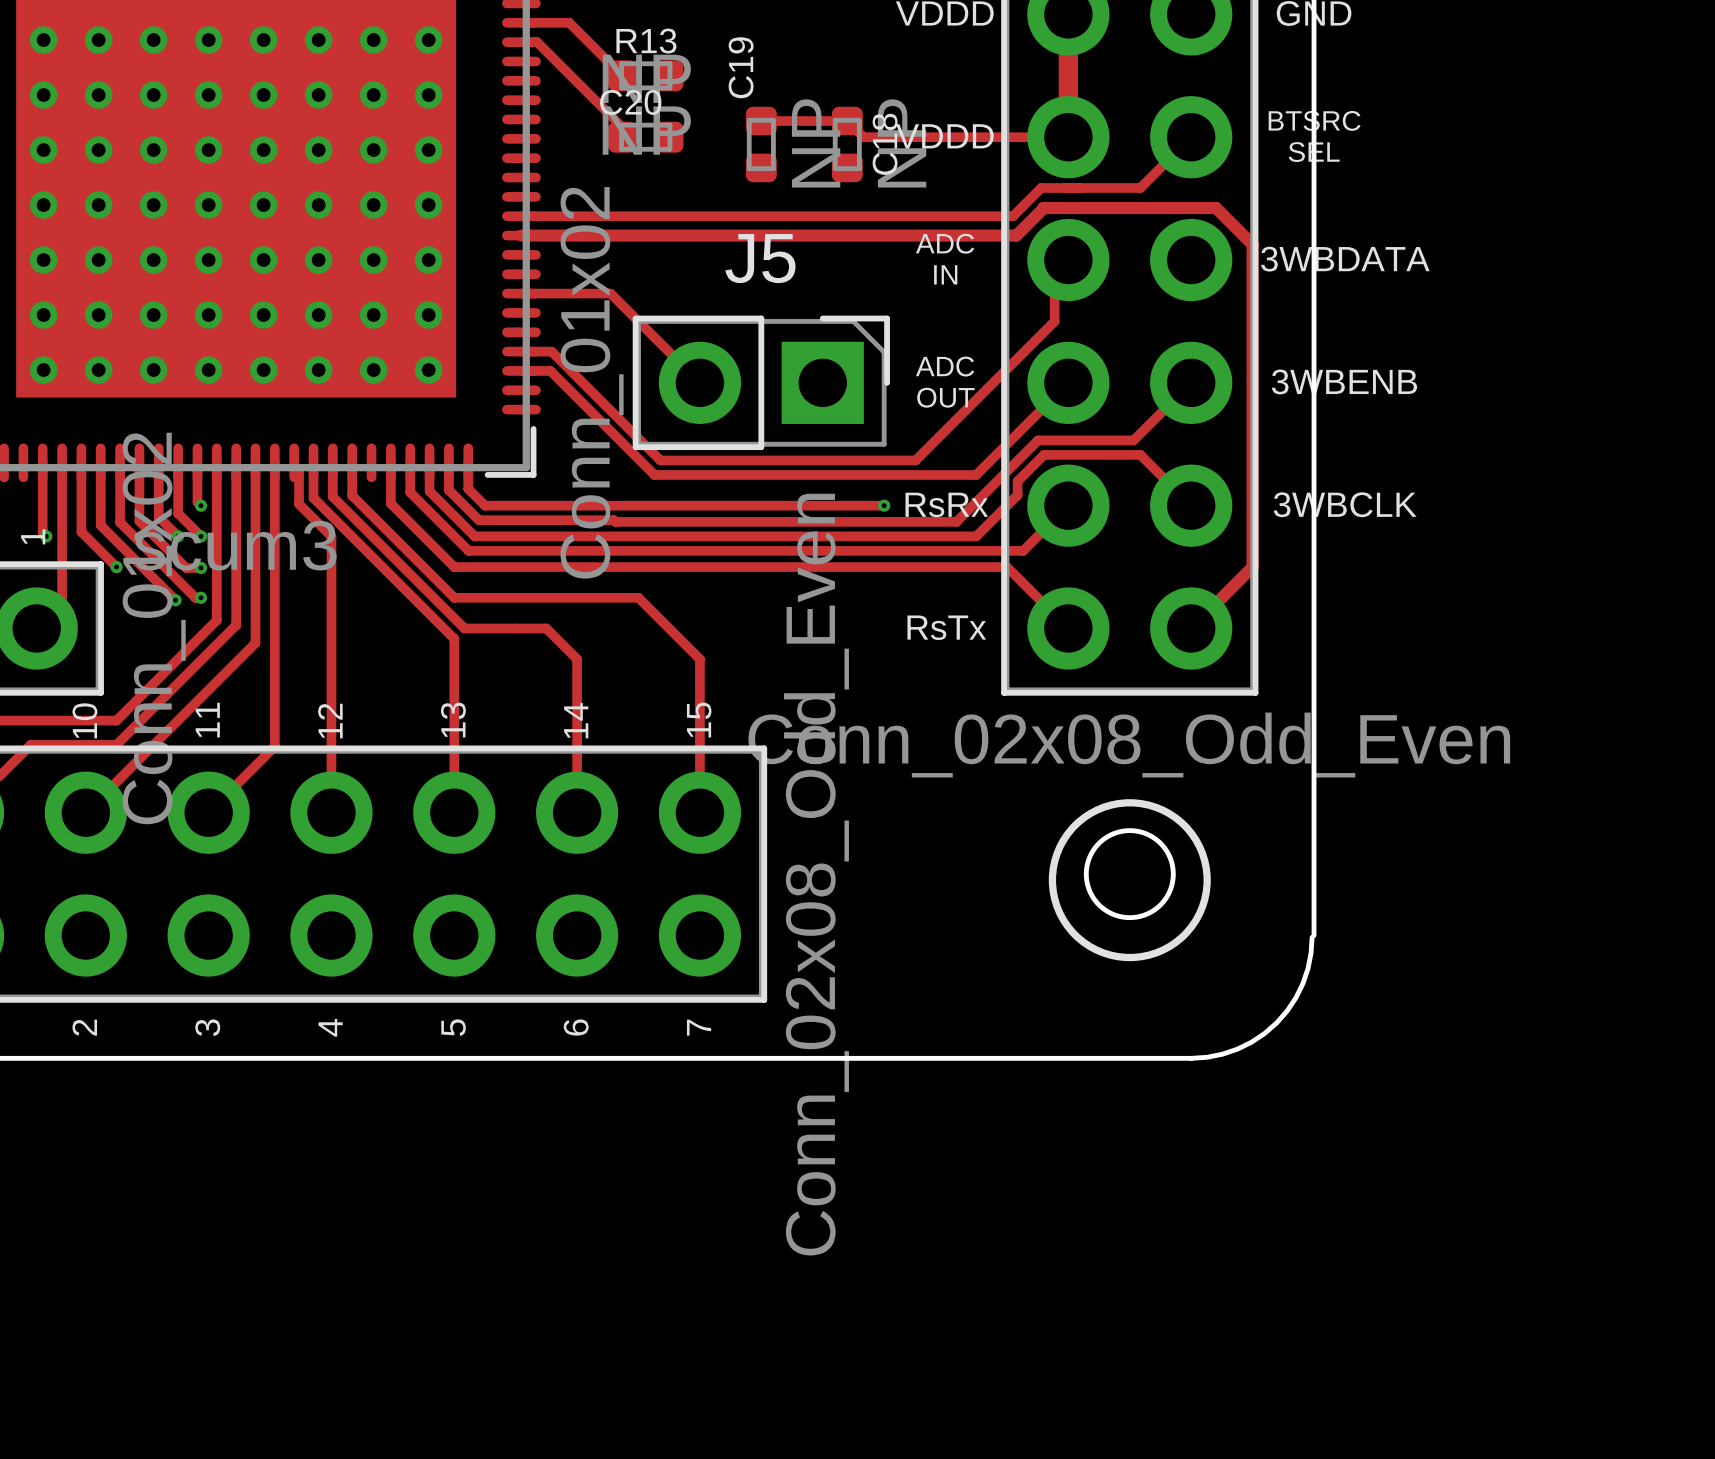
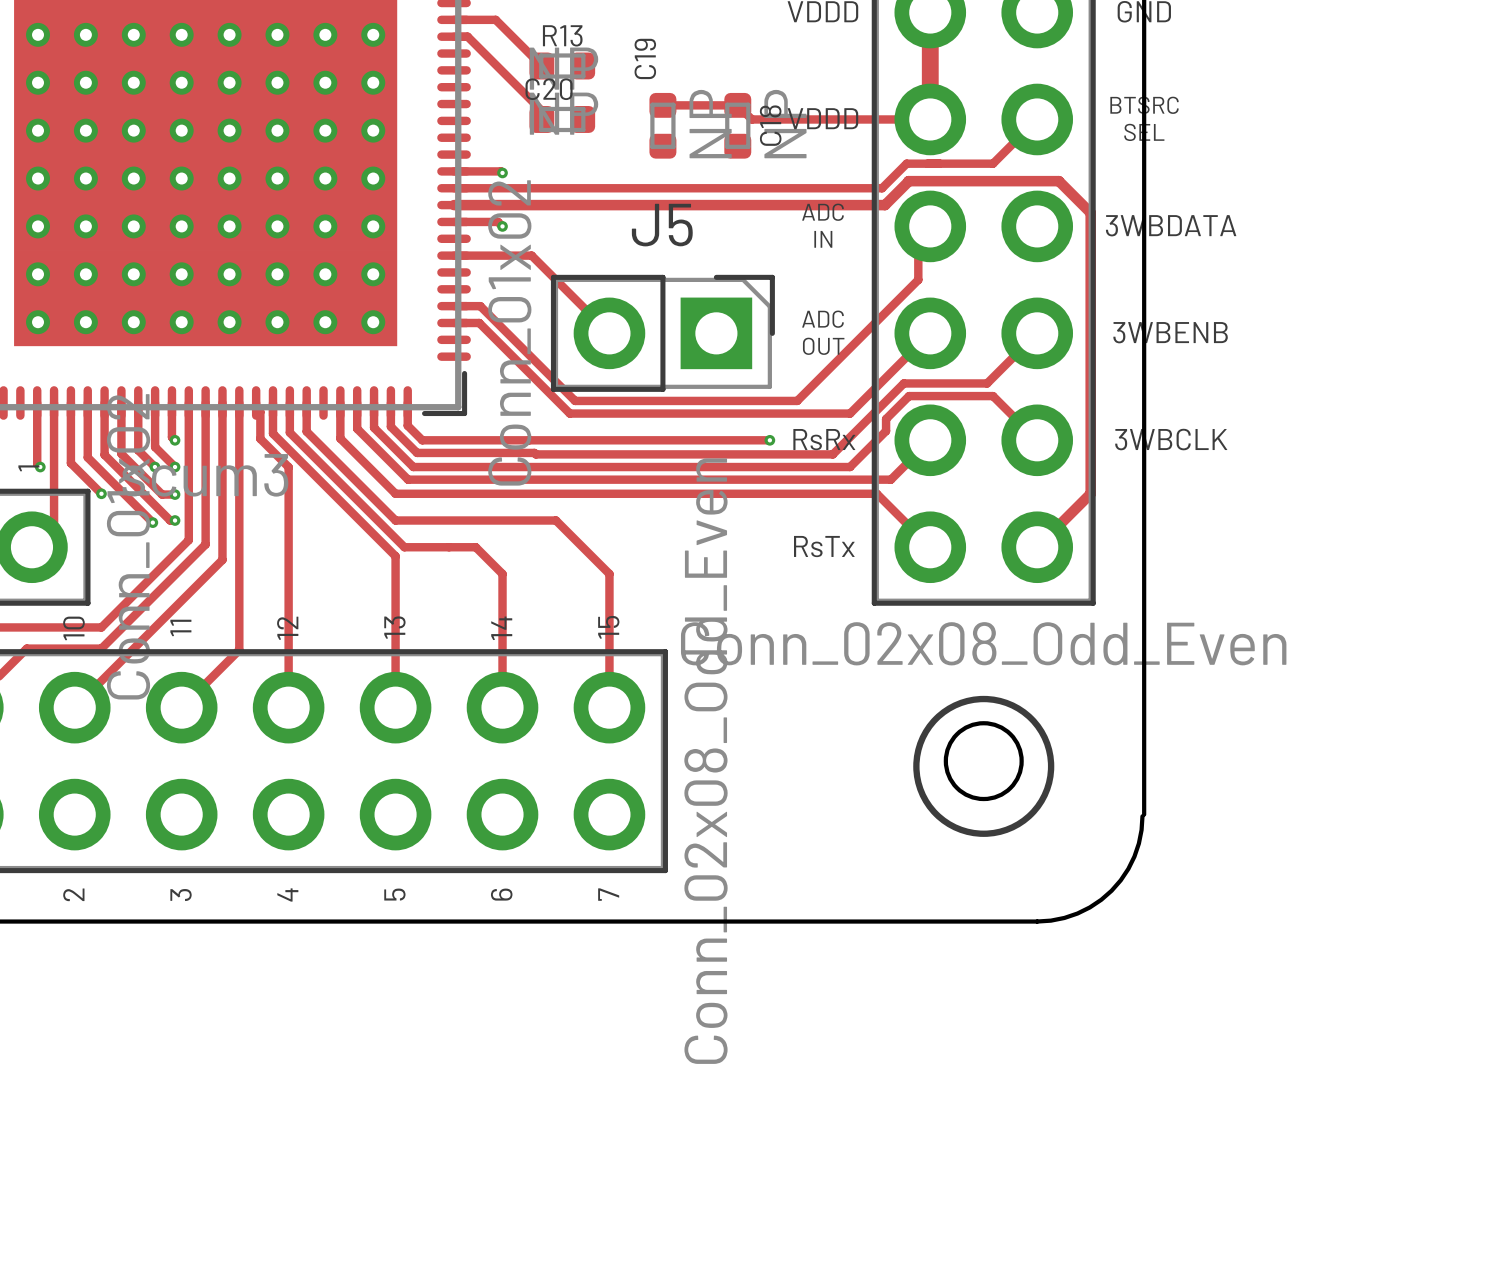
track: none -> (454, 171) (502, 172)
via: none -> (502, 172)
track: none -> (454, 221) (498, 221) (502, 226)
via: none -> (502, 226)

